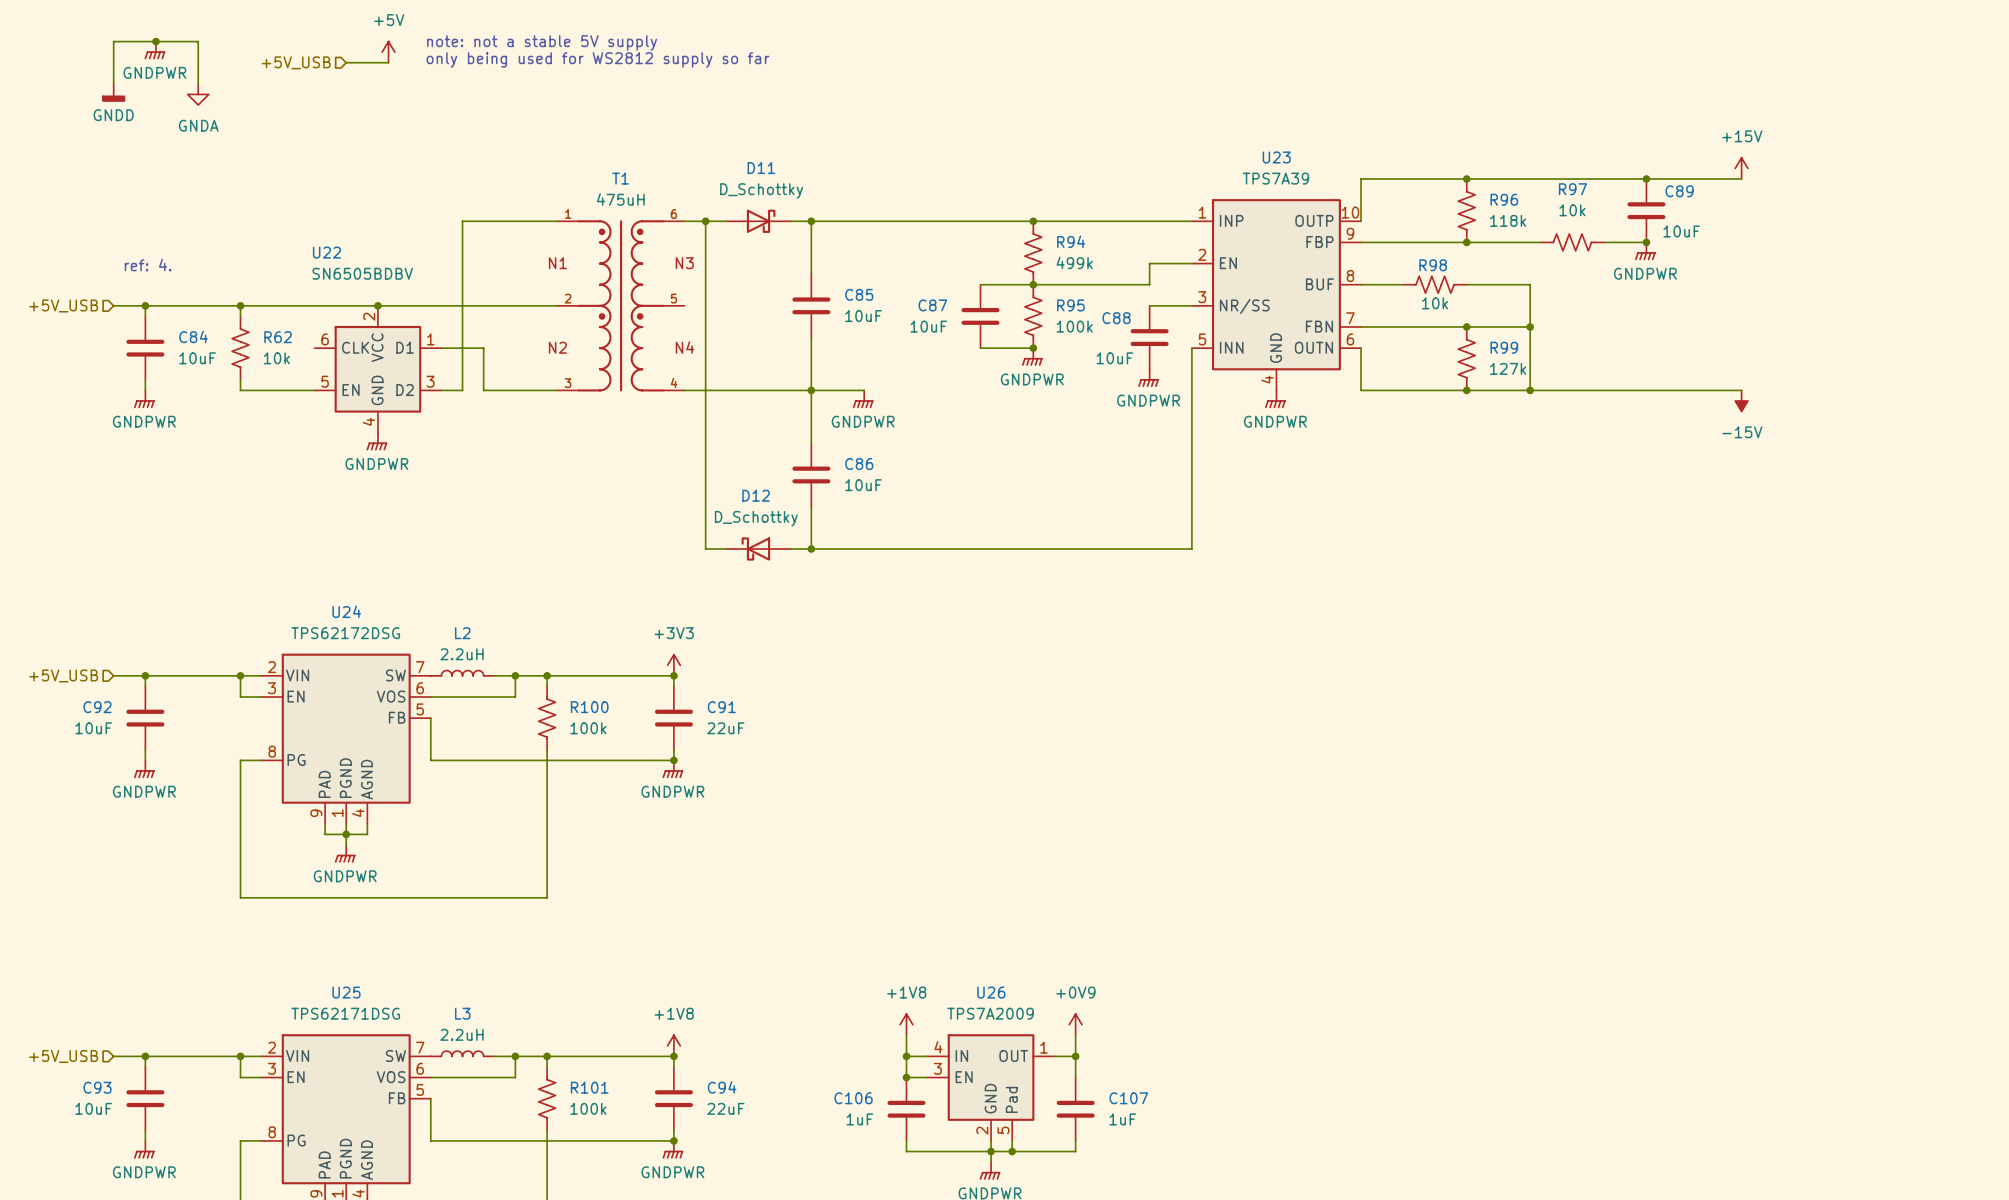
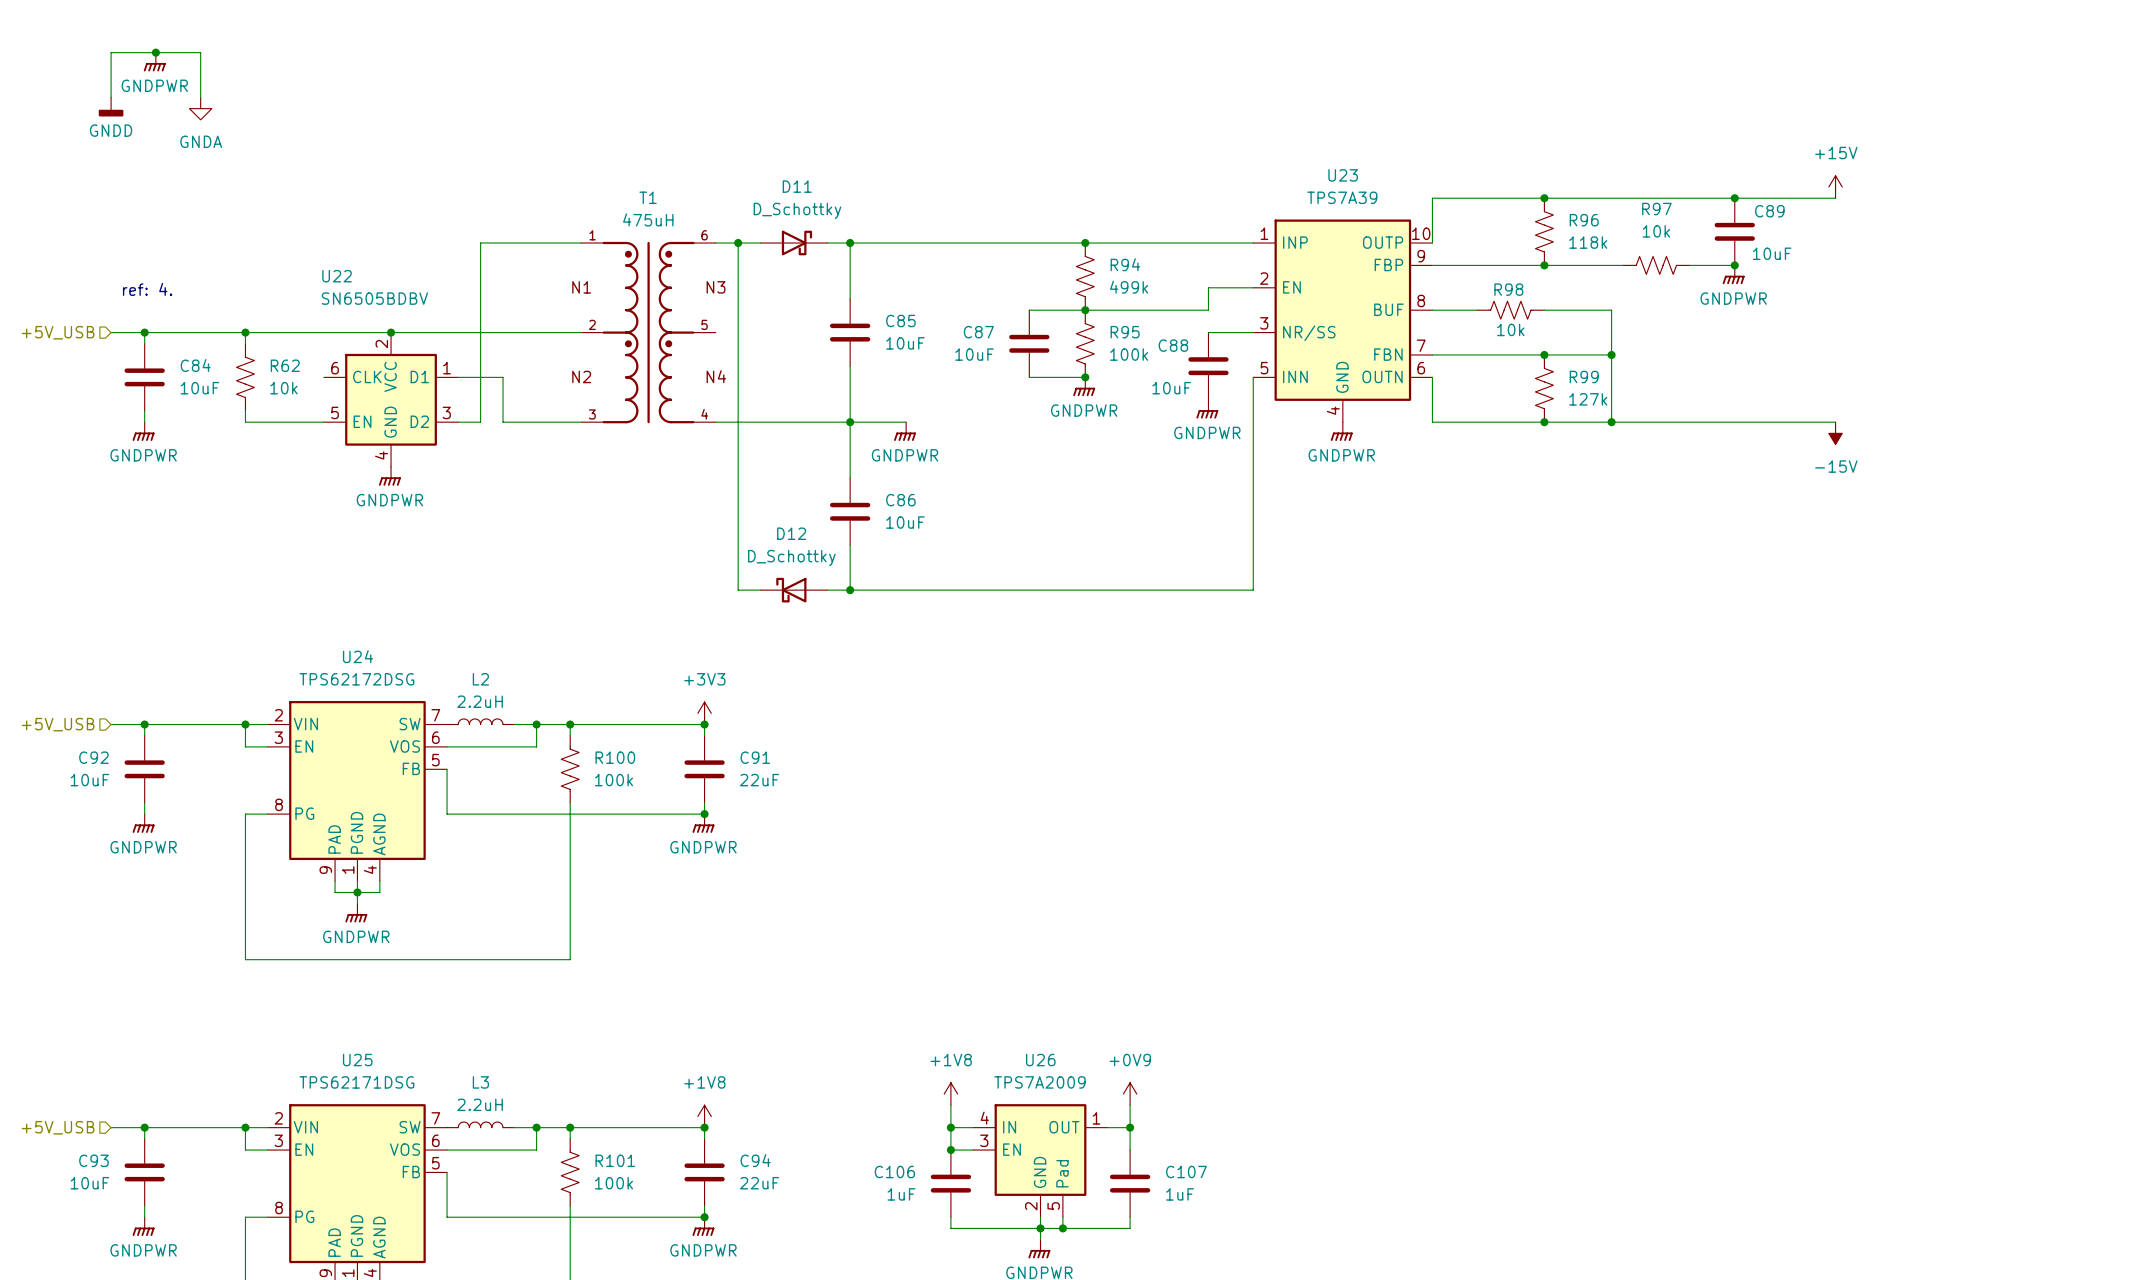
text: note: not a stable 5V supply (542, 42) -> none
power symbol: +5V (388, 52) -> none
text: only being used for WS2812 supply so far (597, 59) -> none
hierarchical label: +5V_USB (296, 62) -> none
wire: (346, 62) (388, 62) -> none

